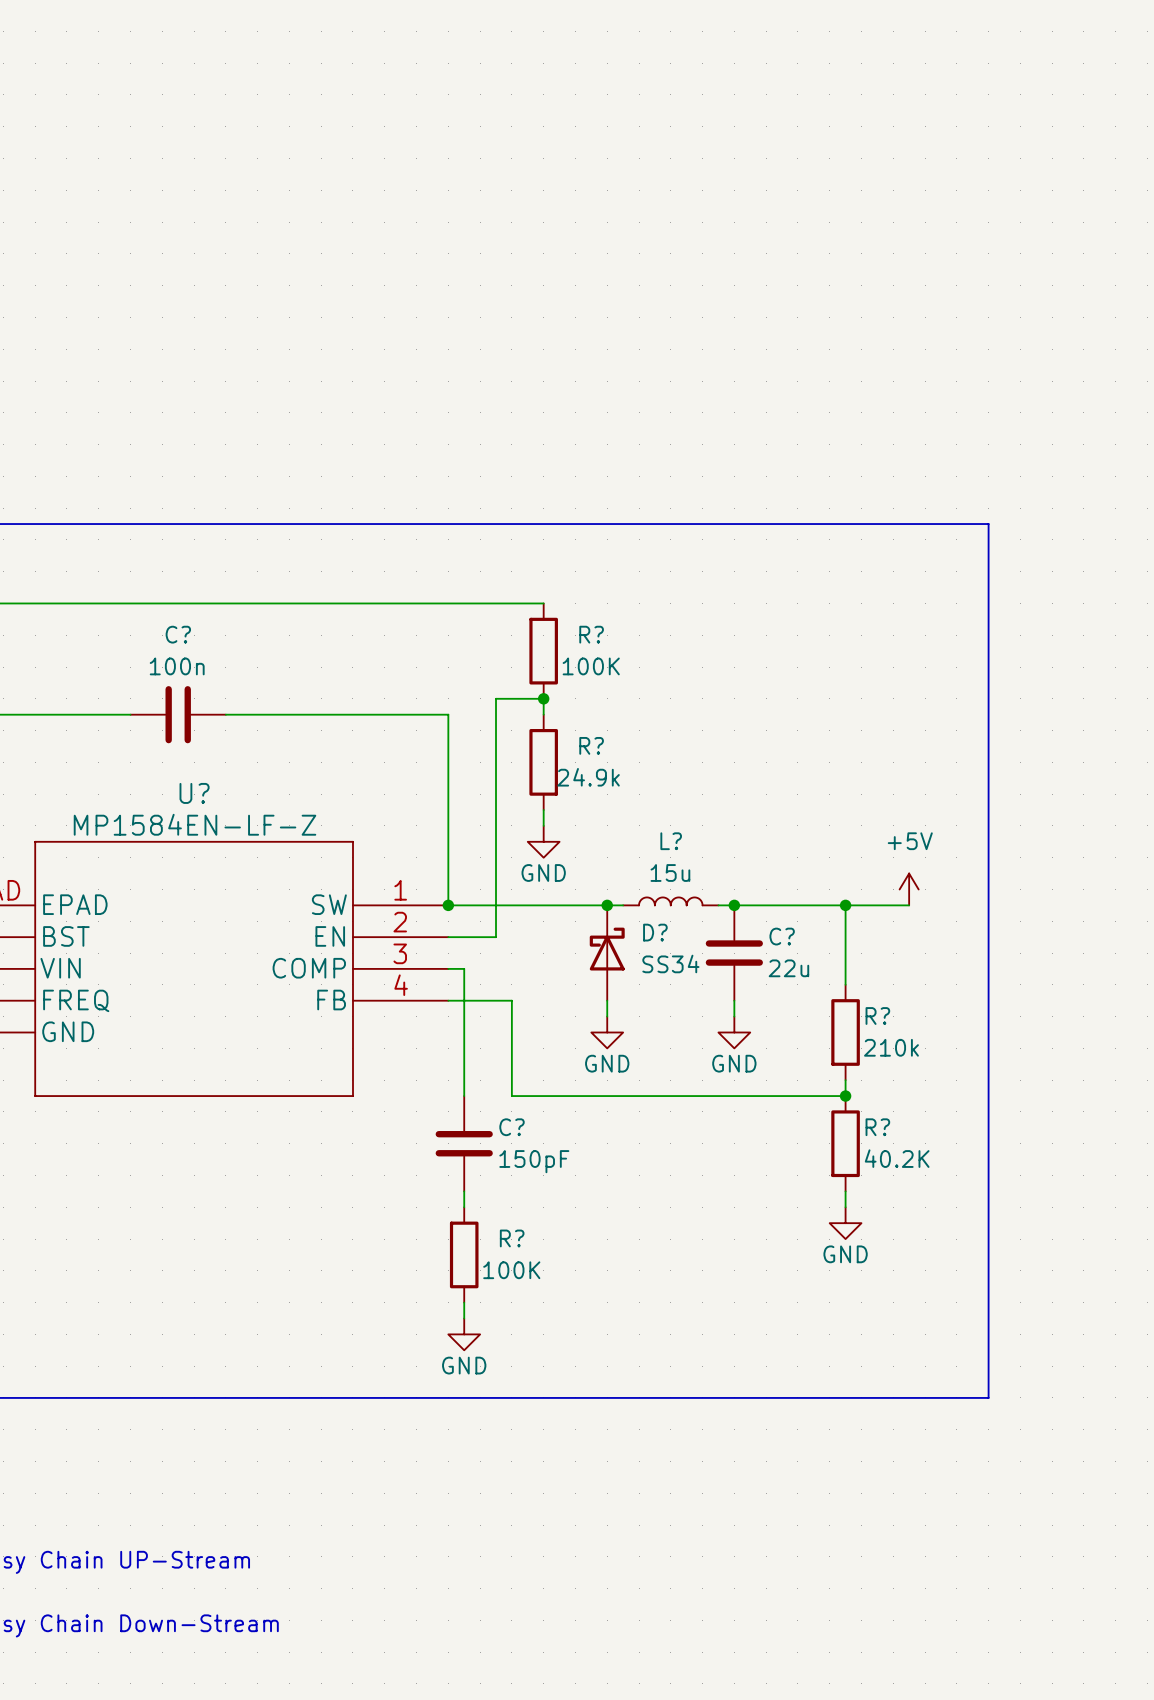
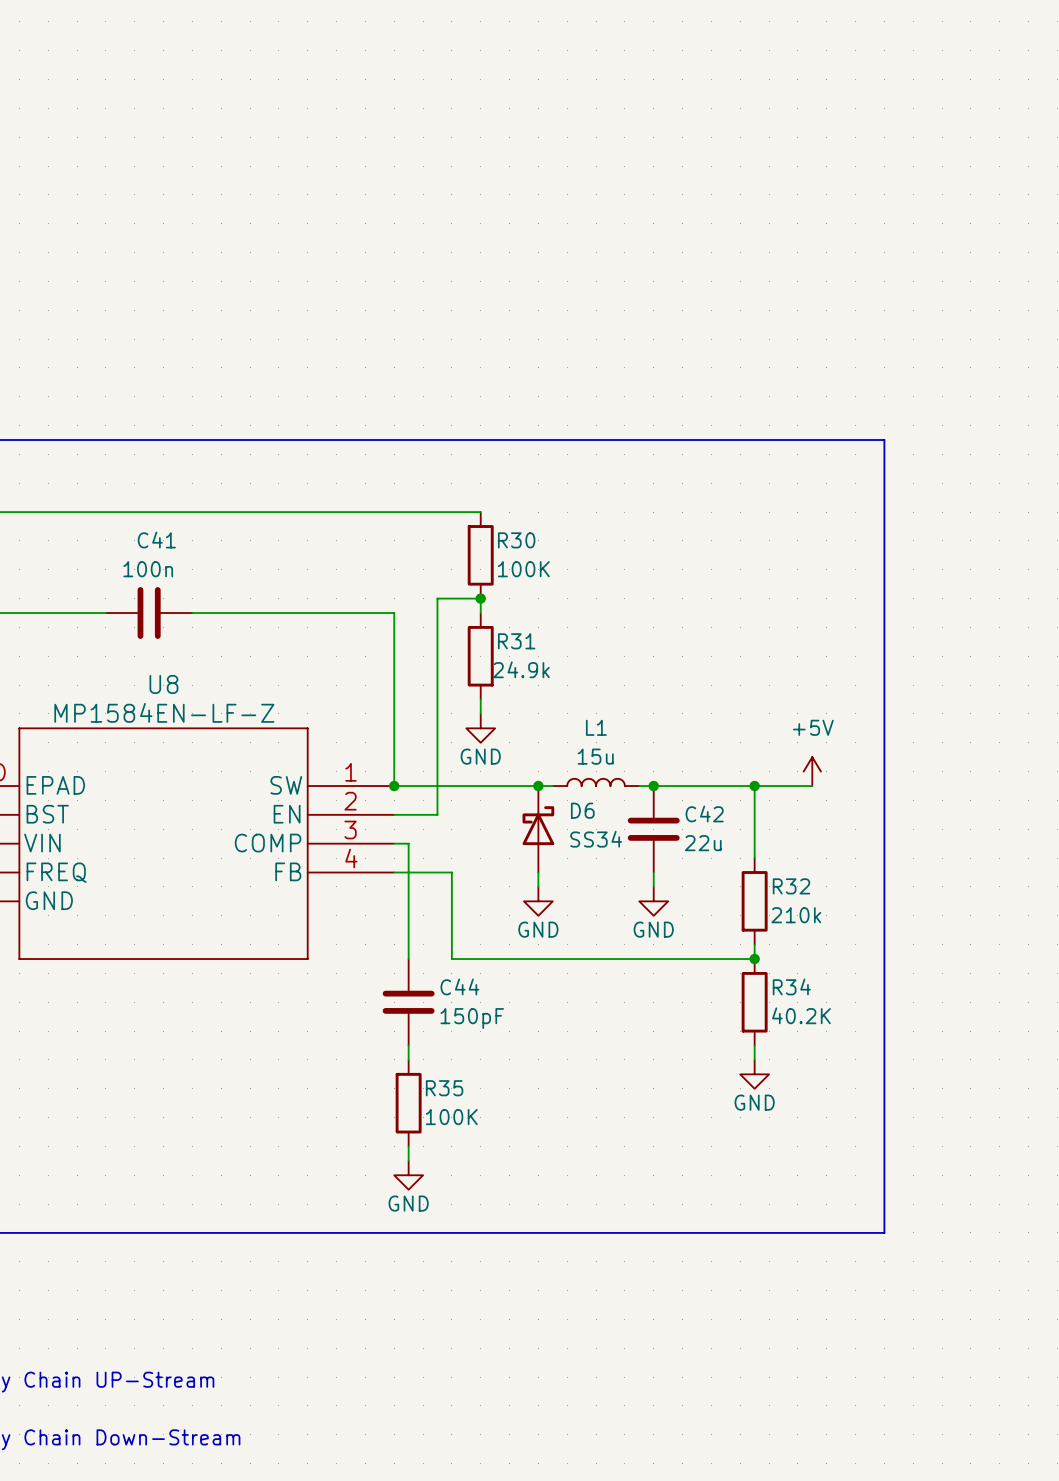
C? name: C? (178, 634) -> C41 (156, 540)
R? name: R? (591, 634) -> R30 (516, 540)
R? name: R? (591, 745) -> R31 (516, 641)
U? name: U? (194, 793) -> U8 (163, 684)
L? name: L? (671, 841) -> L1 (596, 727)
D? name: D? (655, 932) -> D6 (582, 810)
C? name: C? (782, 936) -> C42 (704, 813)
R? name: R? (877, 1016) -> R32 (791, 886)
C? name: C? (512, 1127) -> C44 (459, 986)
R? name: R? (877, 1127) -> R34 (791, 986)
R? name: R? (512, 1238) -> R35 (444, 1088)

